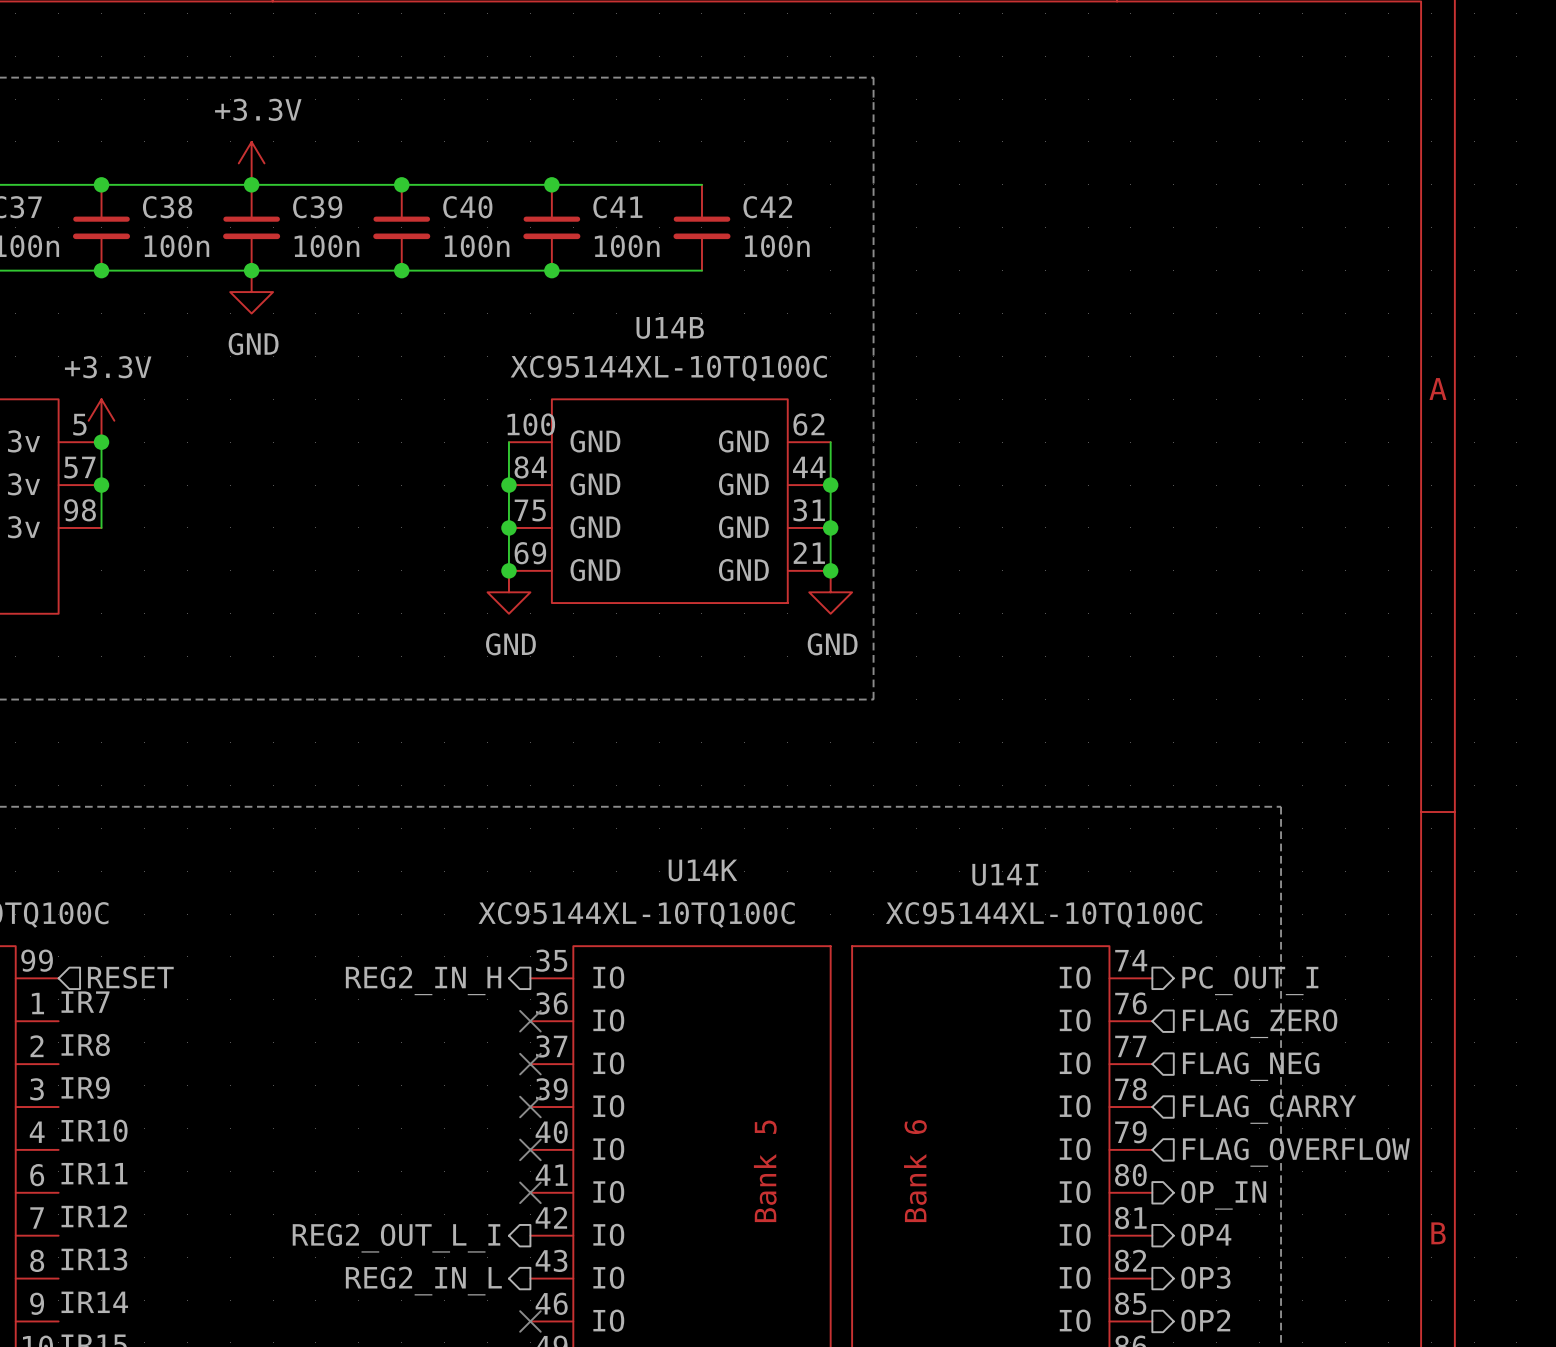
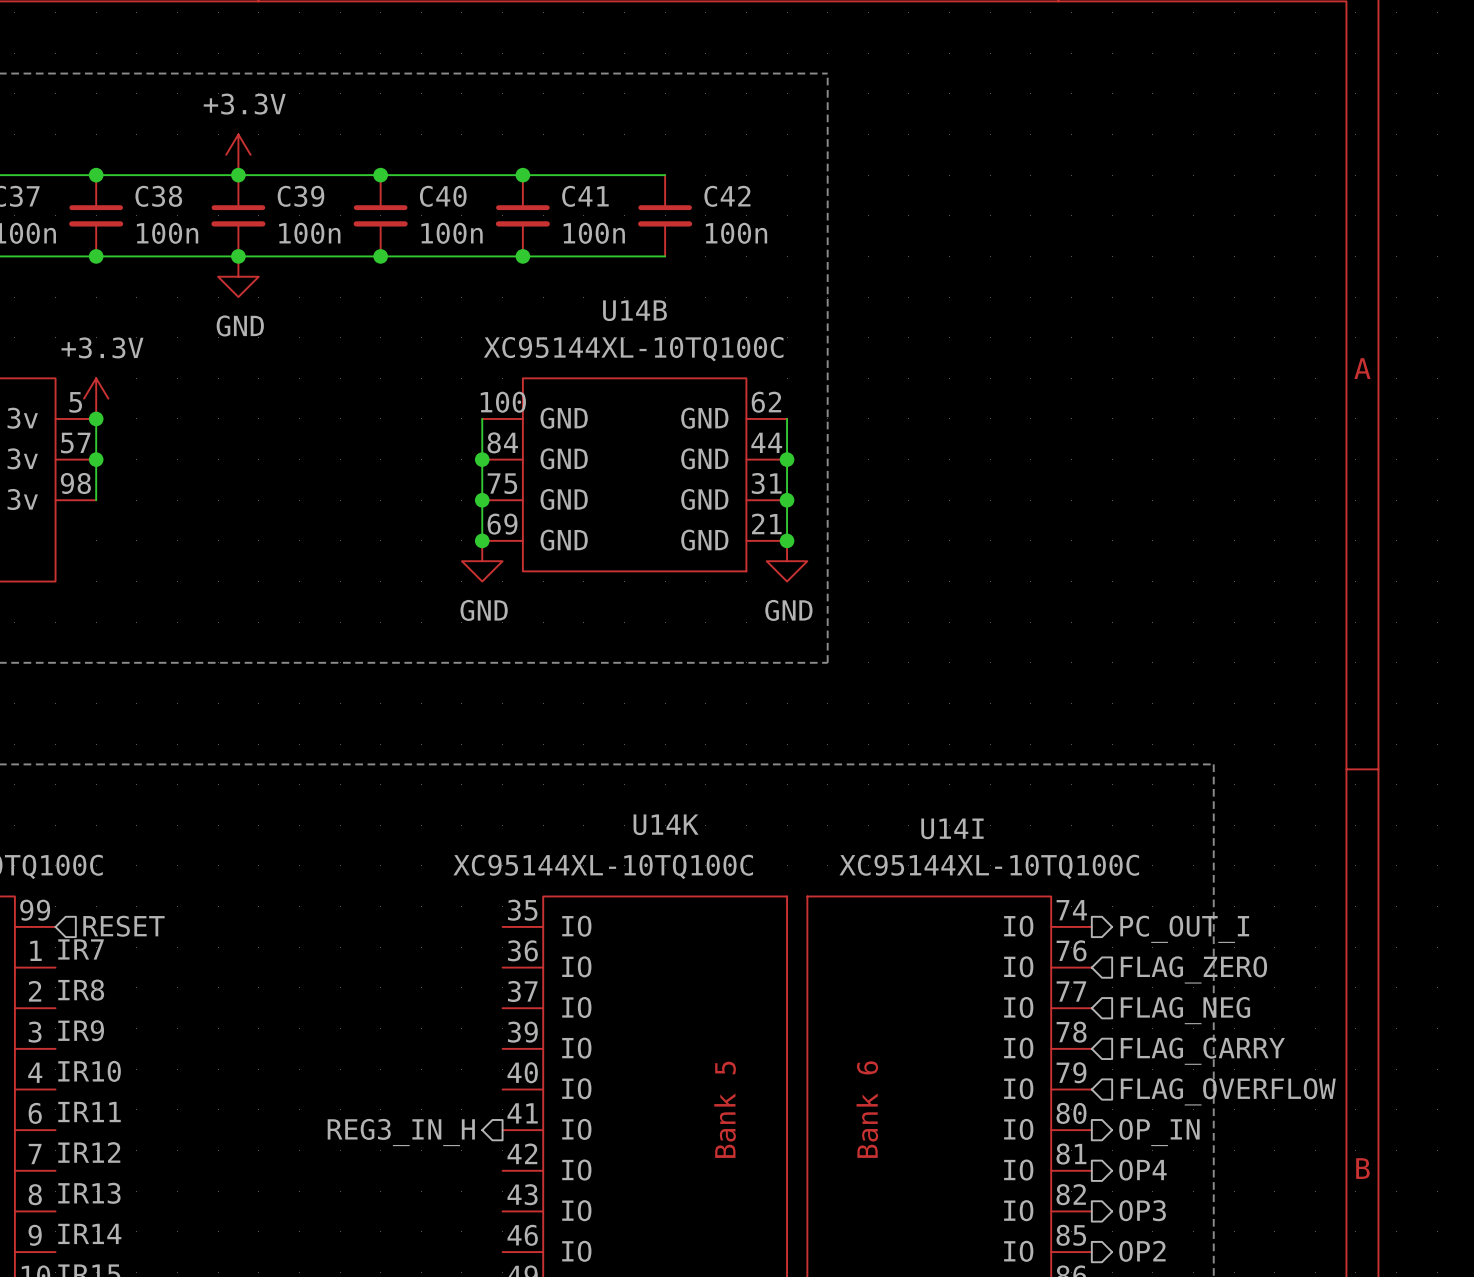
hierarchical label: REG2_IN_H (423, 980) -> none
no-connect mark: (530, 1021) -> none
no-connect mark: (530, 1064) -> none
no-connect mark: (530, 1107) -> none
no-connect mark: (530, 1149) -> none
no-connect mark: (530, 1192) -> none
hierarchical label: none -> REG3_IN_H (401, 1132)
hierarchical label: REG2_OUT_L_I (396, 1238) -> none
hierarchical label: REG2_IN_L (423, 1281) -> none
no-connect mark: (530, 1321) -> none

